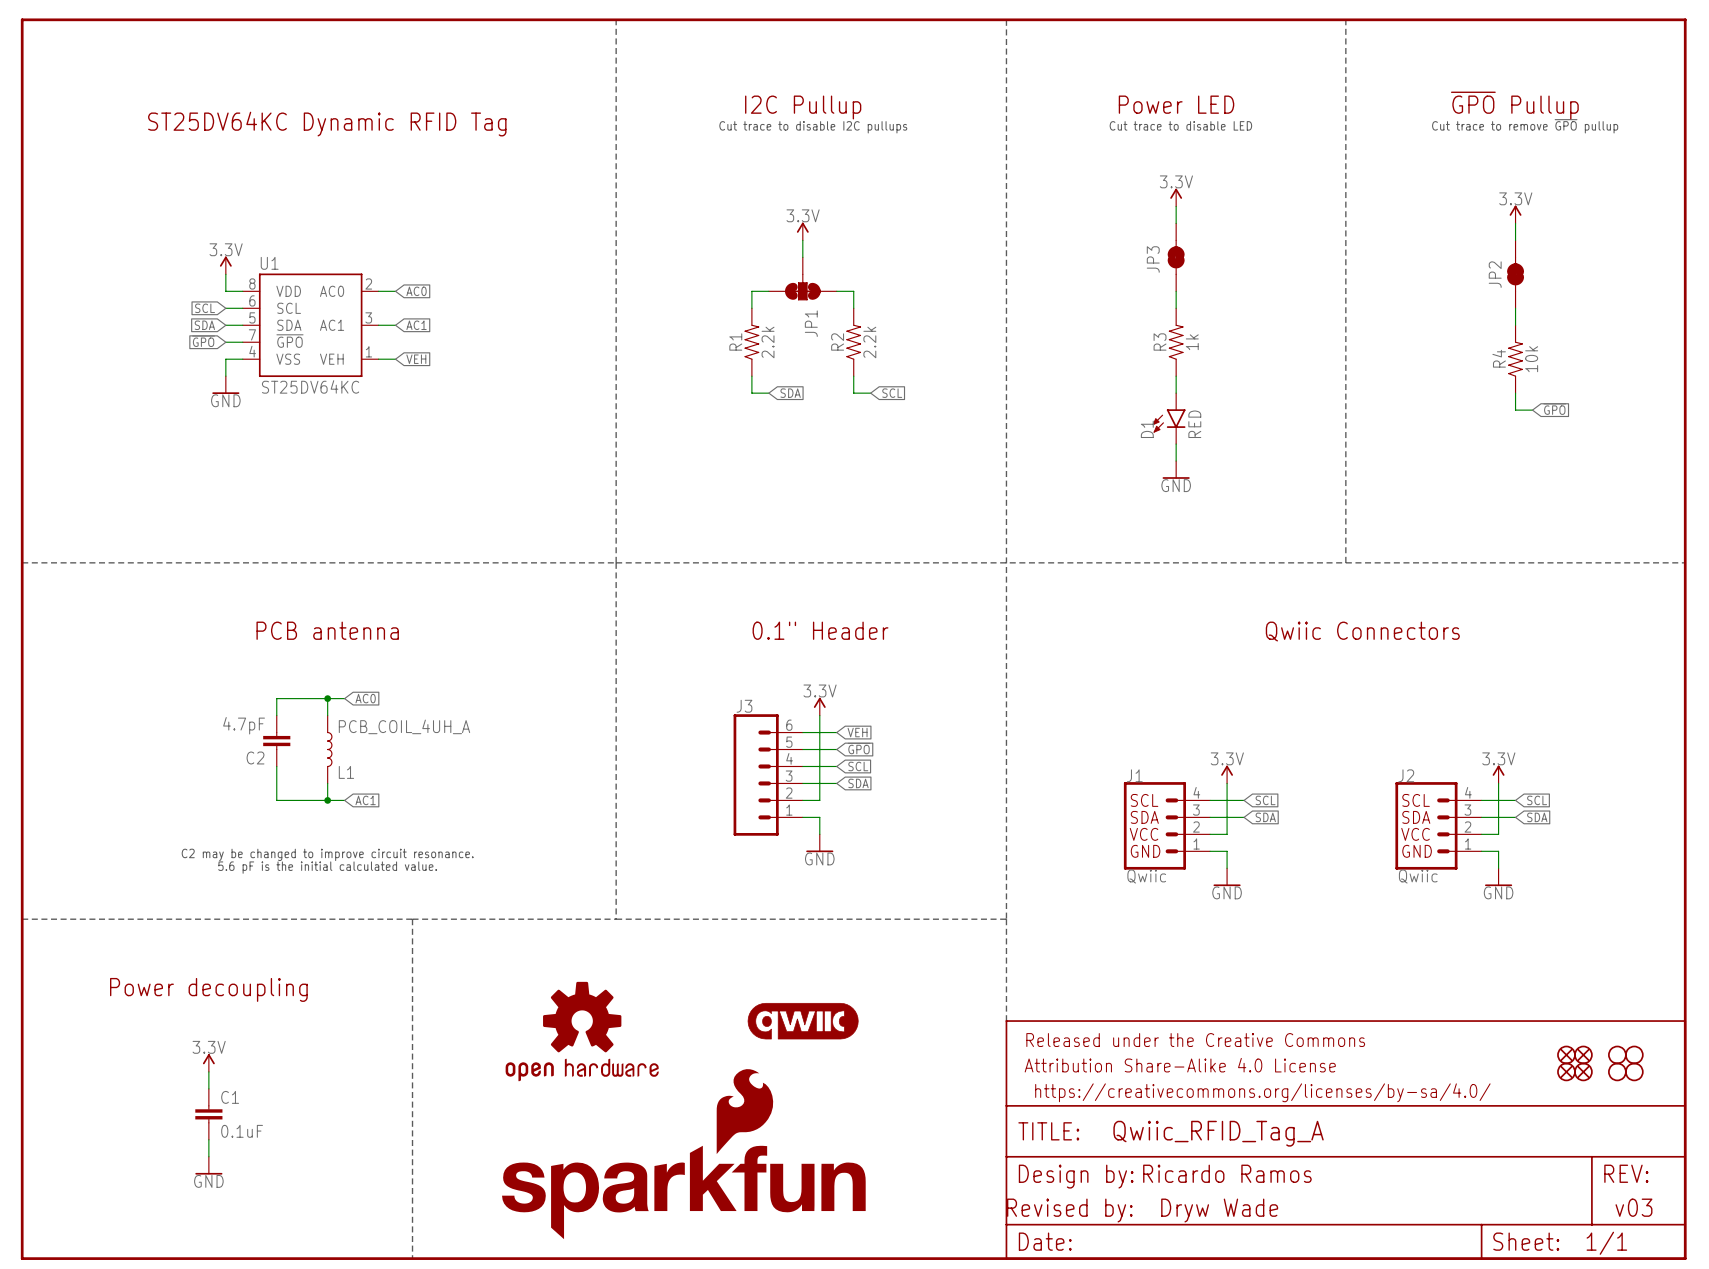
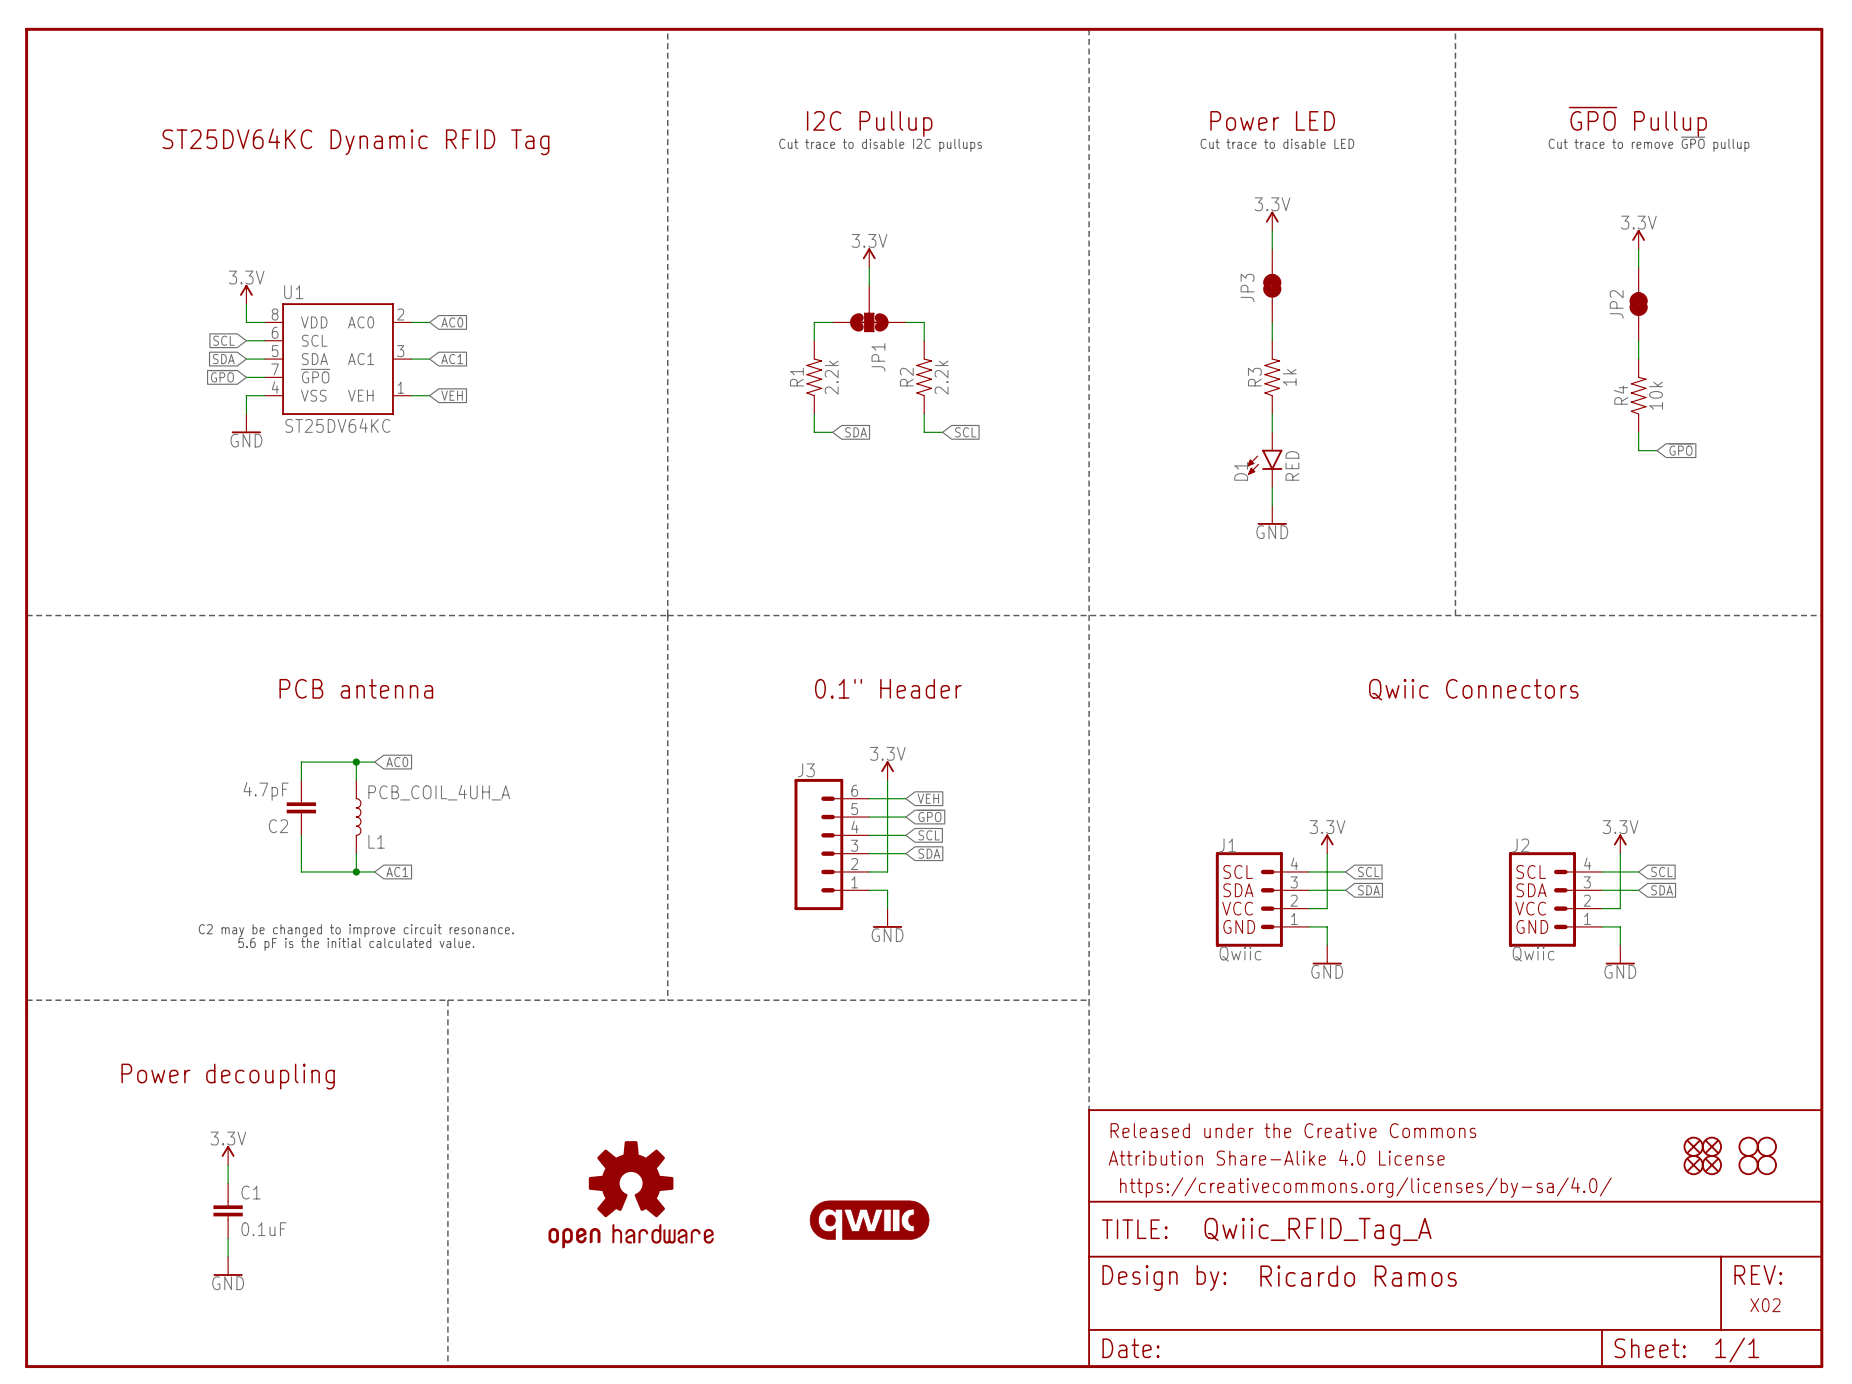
part position: (803, 1021) -> (869, 1220)
part position: (582, 1031) -> (631, 1194)
part: (683, 1154) -> none
text: Ricardo Ramos (1227, 1173) -> none
part text: none -> Ricardo Ramos (1358, 1276)
part text: none -> X02 (1765, 1305)
text: v03 (1633, 1207) -> none
text: Revised by: Dryw Wade (1142, 1210) -> none

